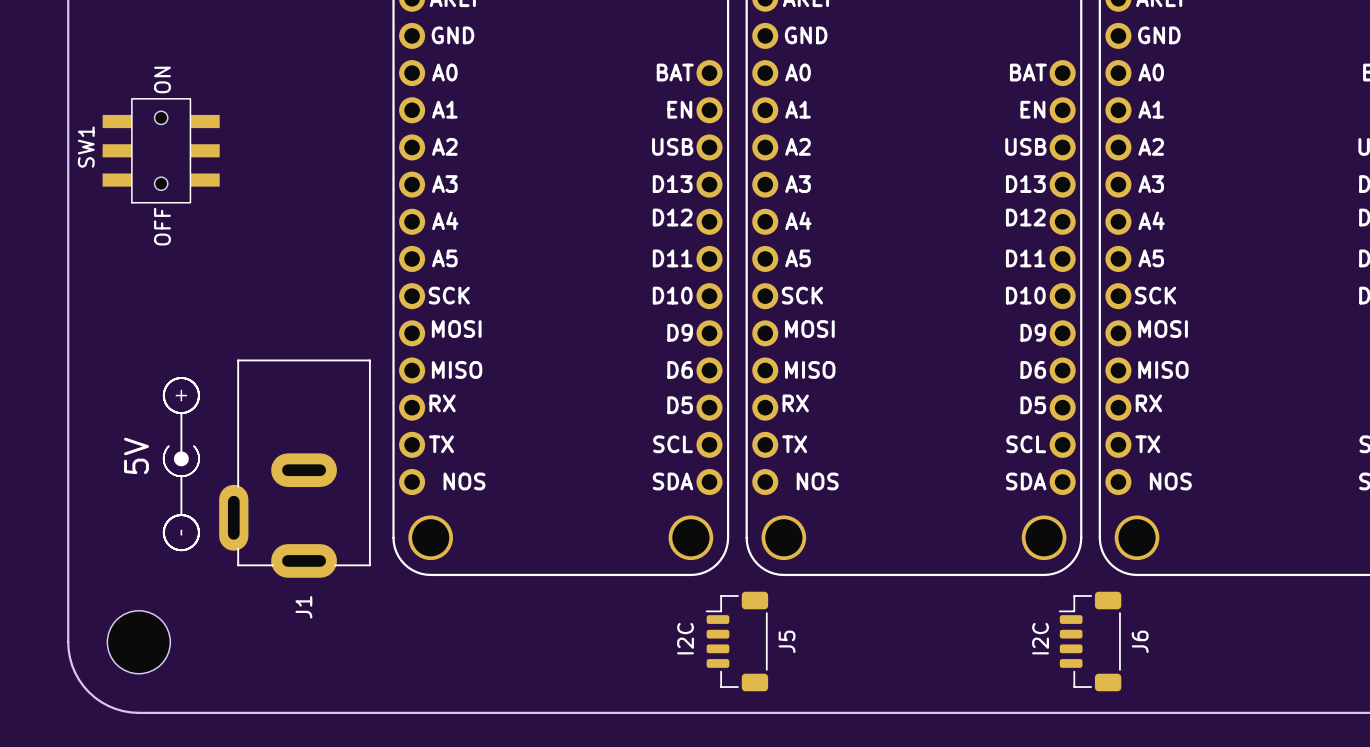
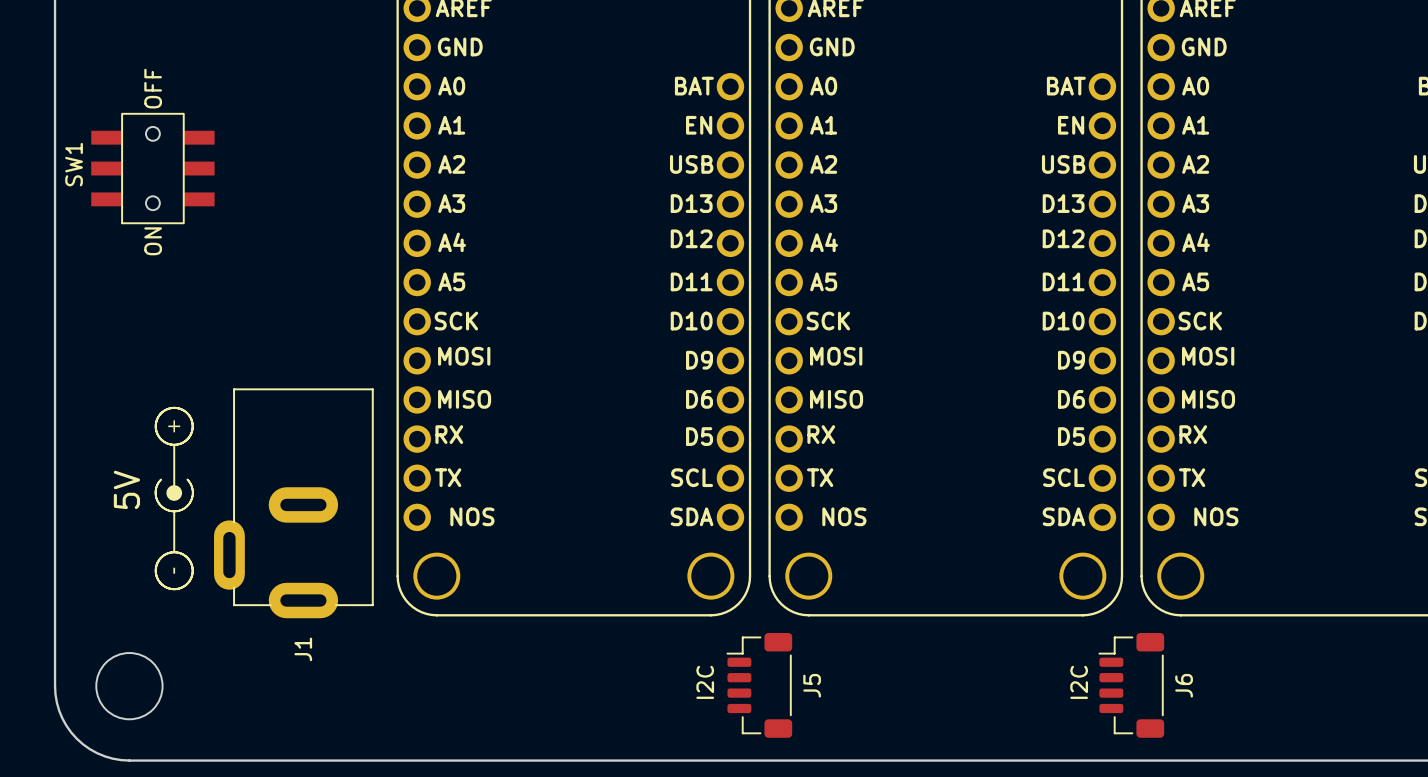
text: ON (162, 79) -> OFF (153, 88)
text: OFF (162, 226) -> ON (153, 241)

